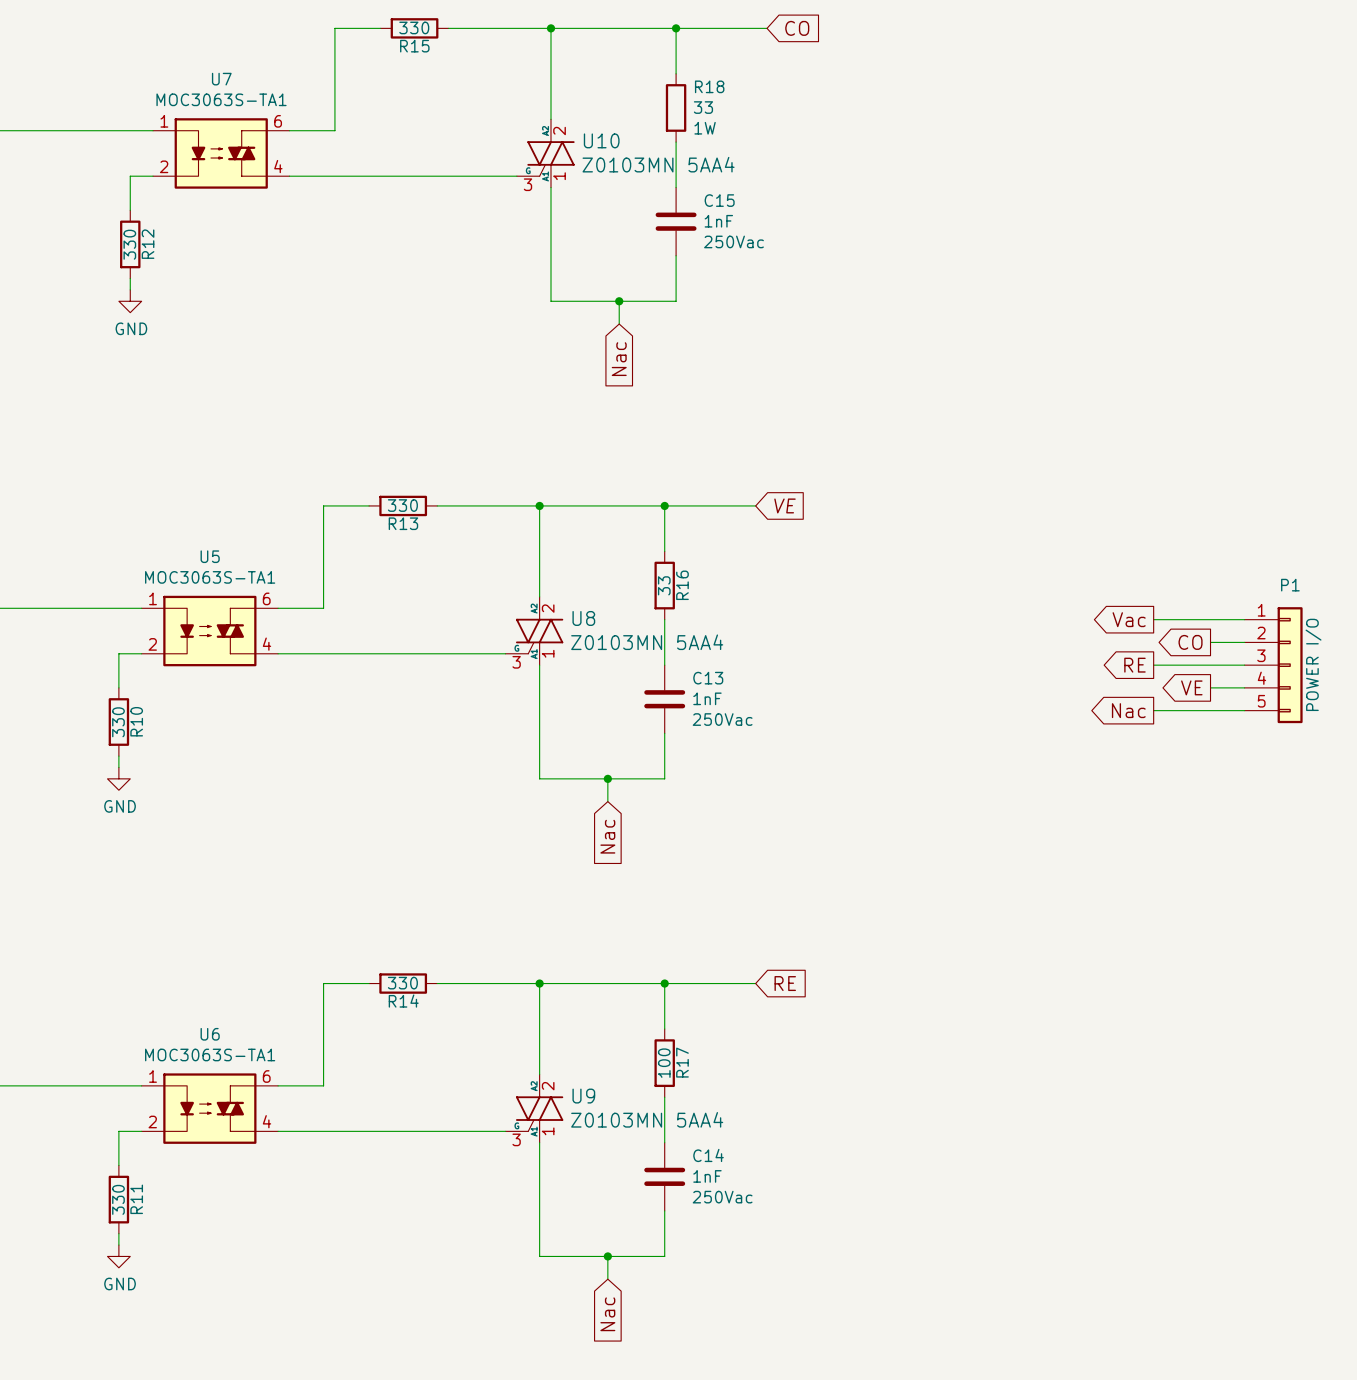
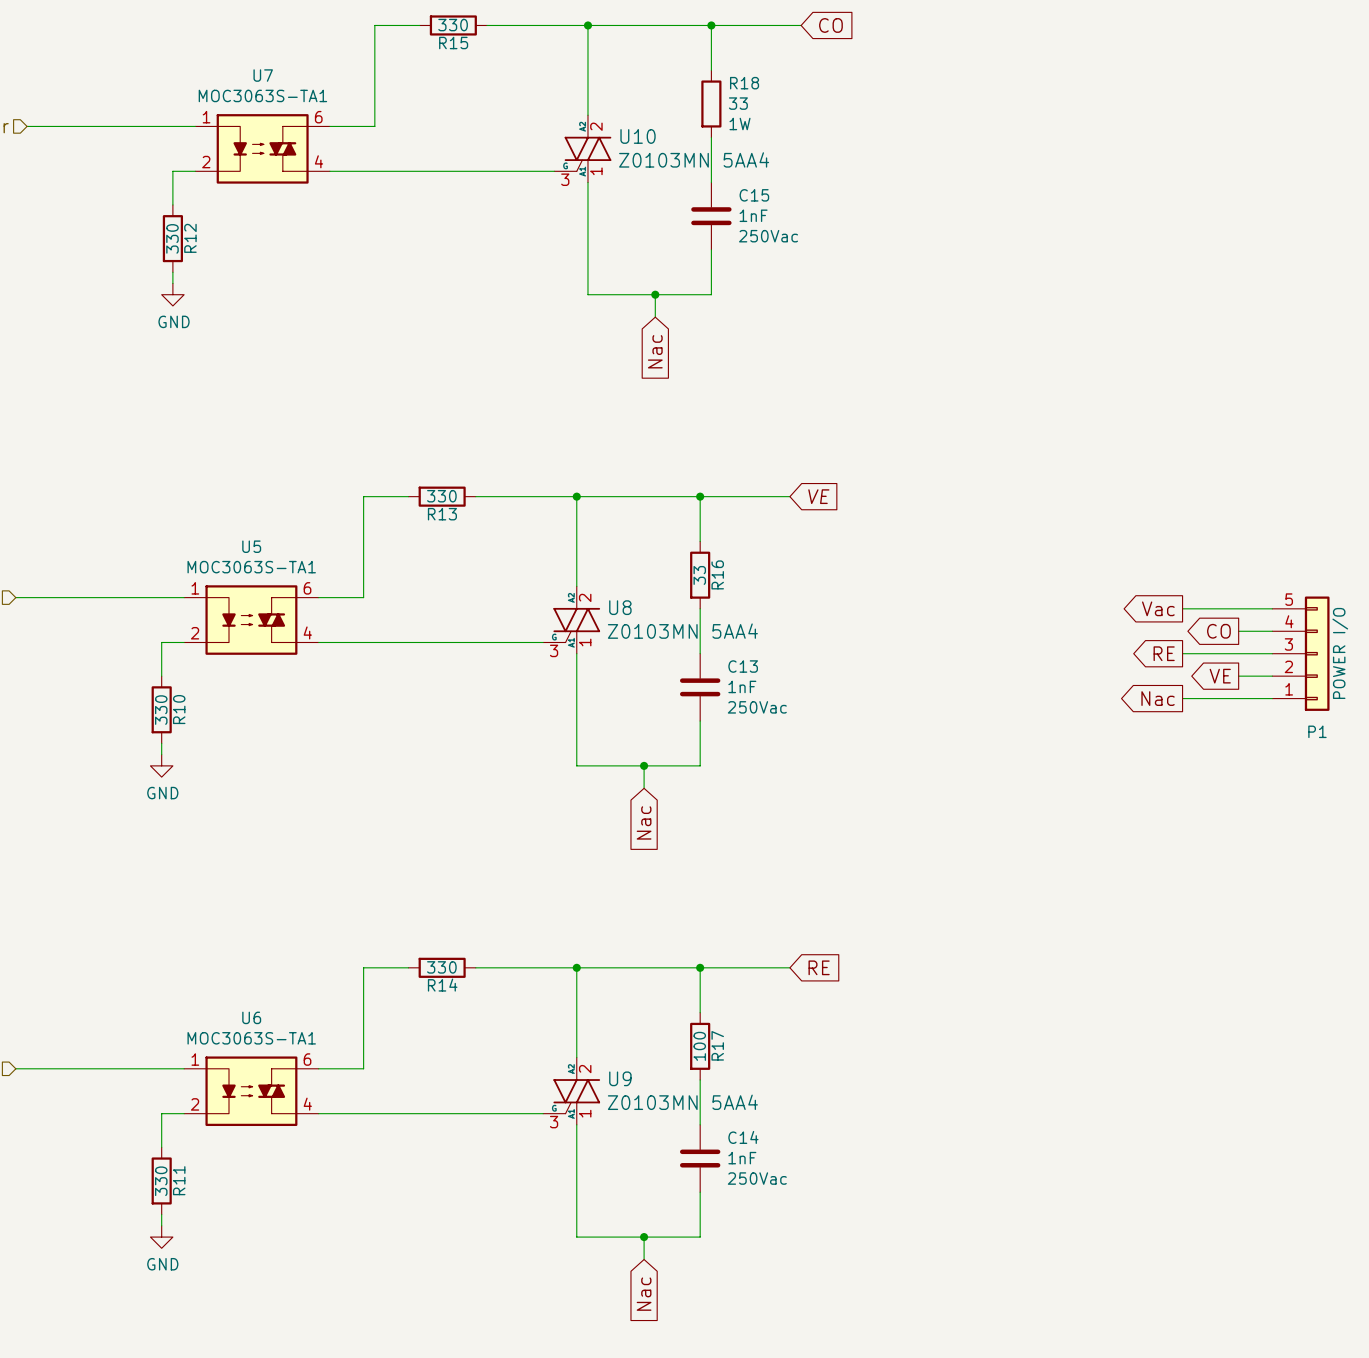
P1 flip: as is (1290, 665) -> up-down (1317, 653)

